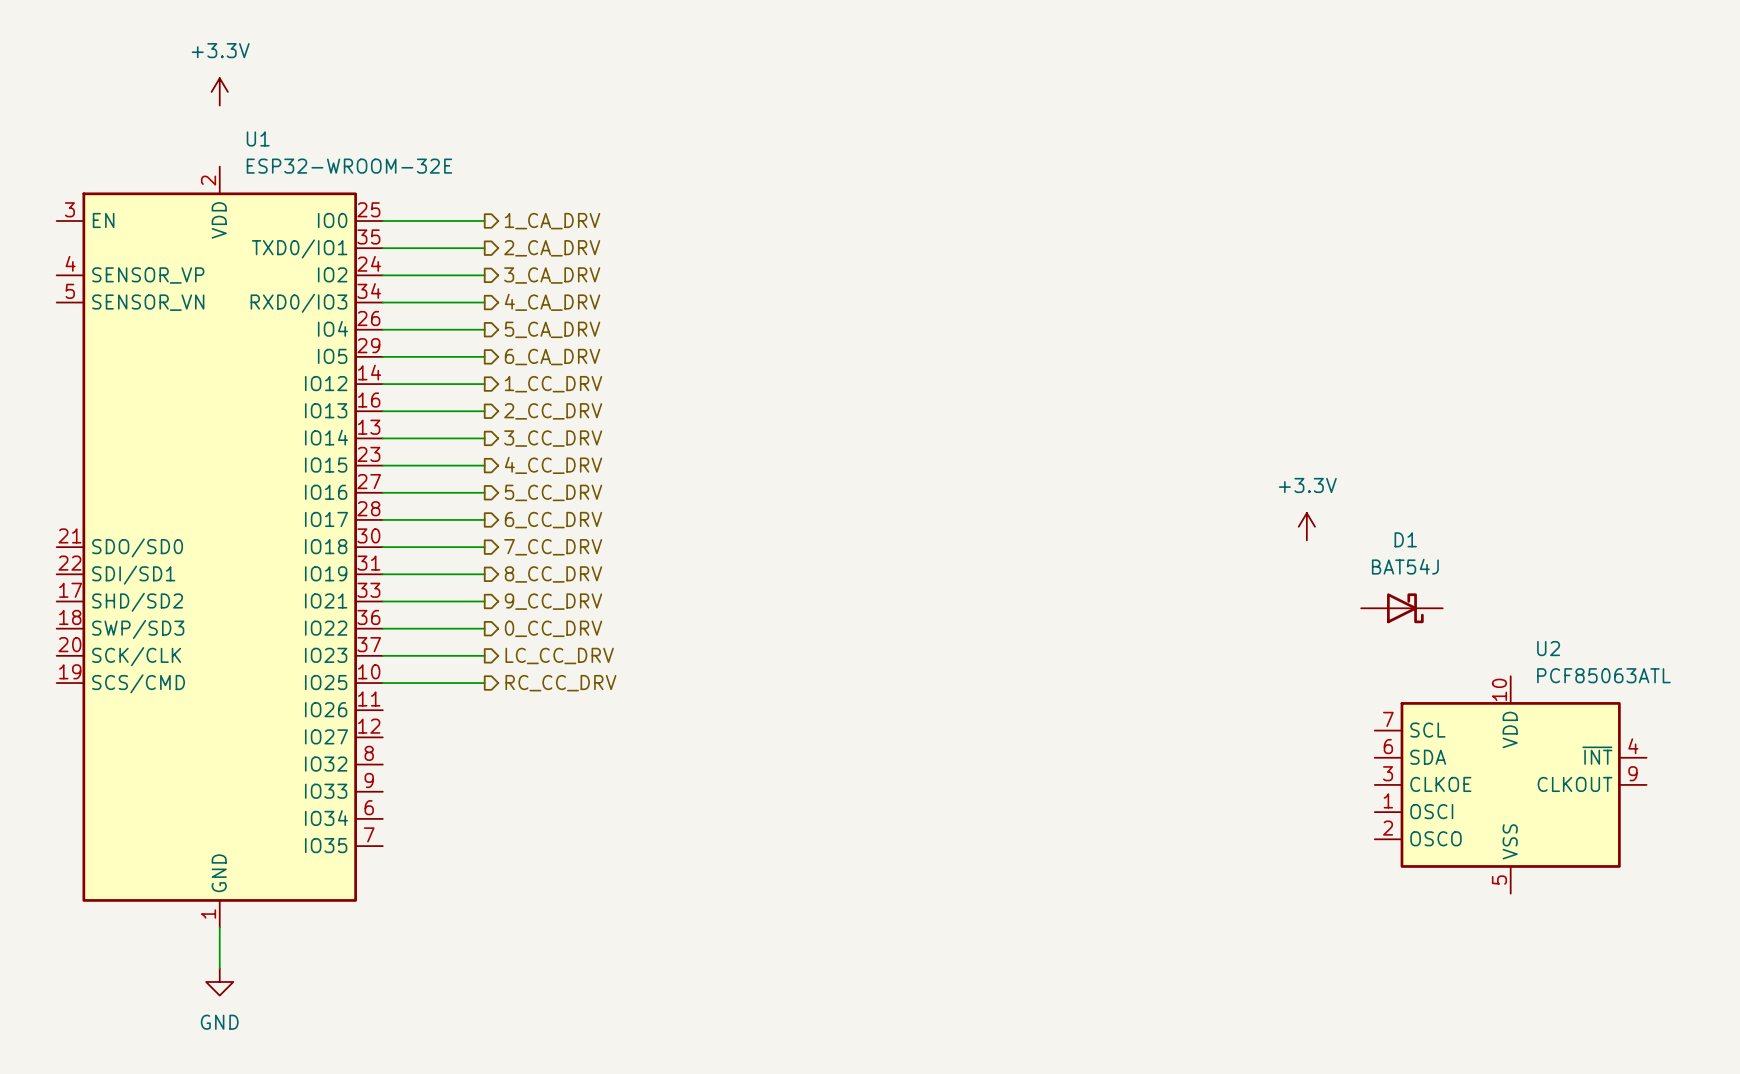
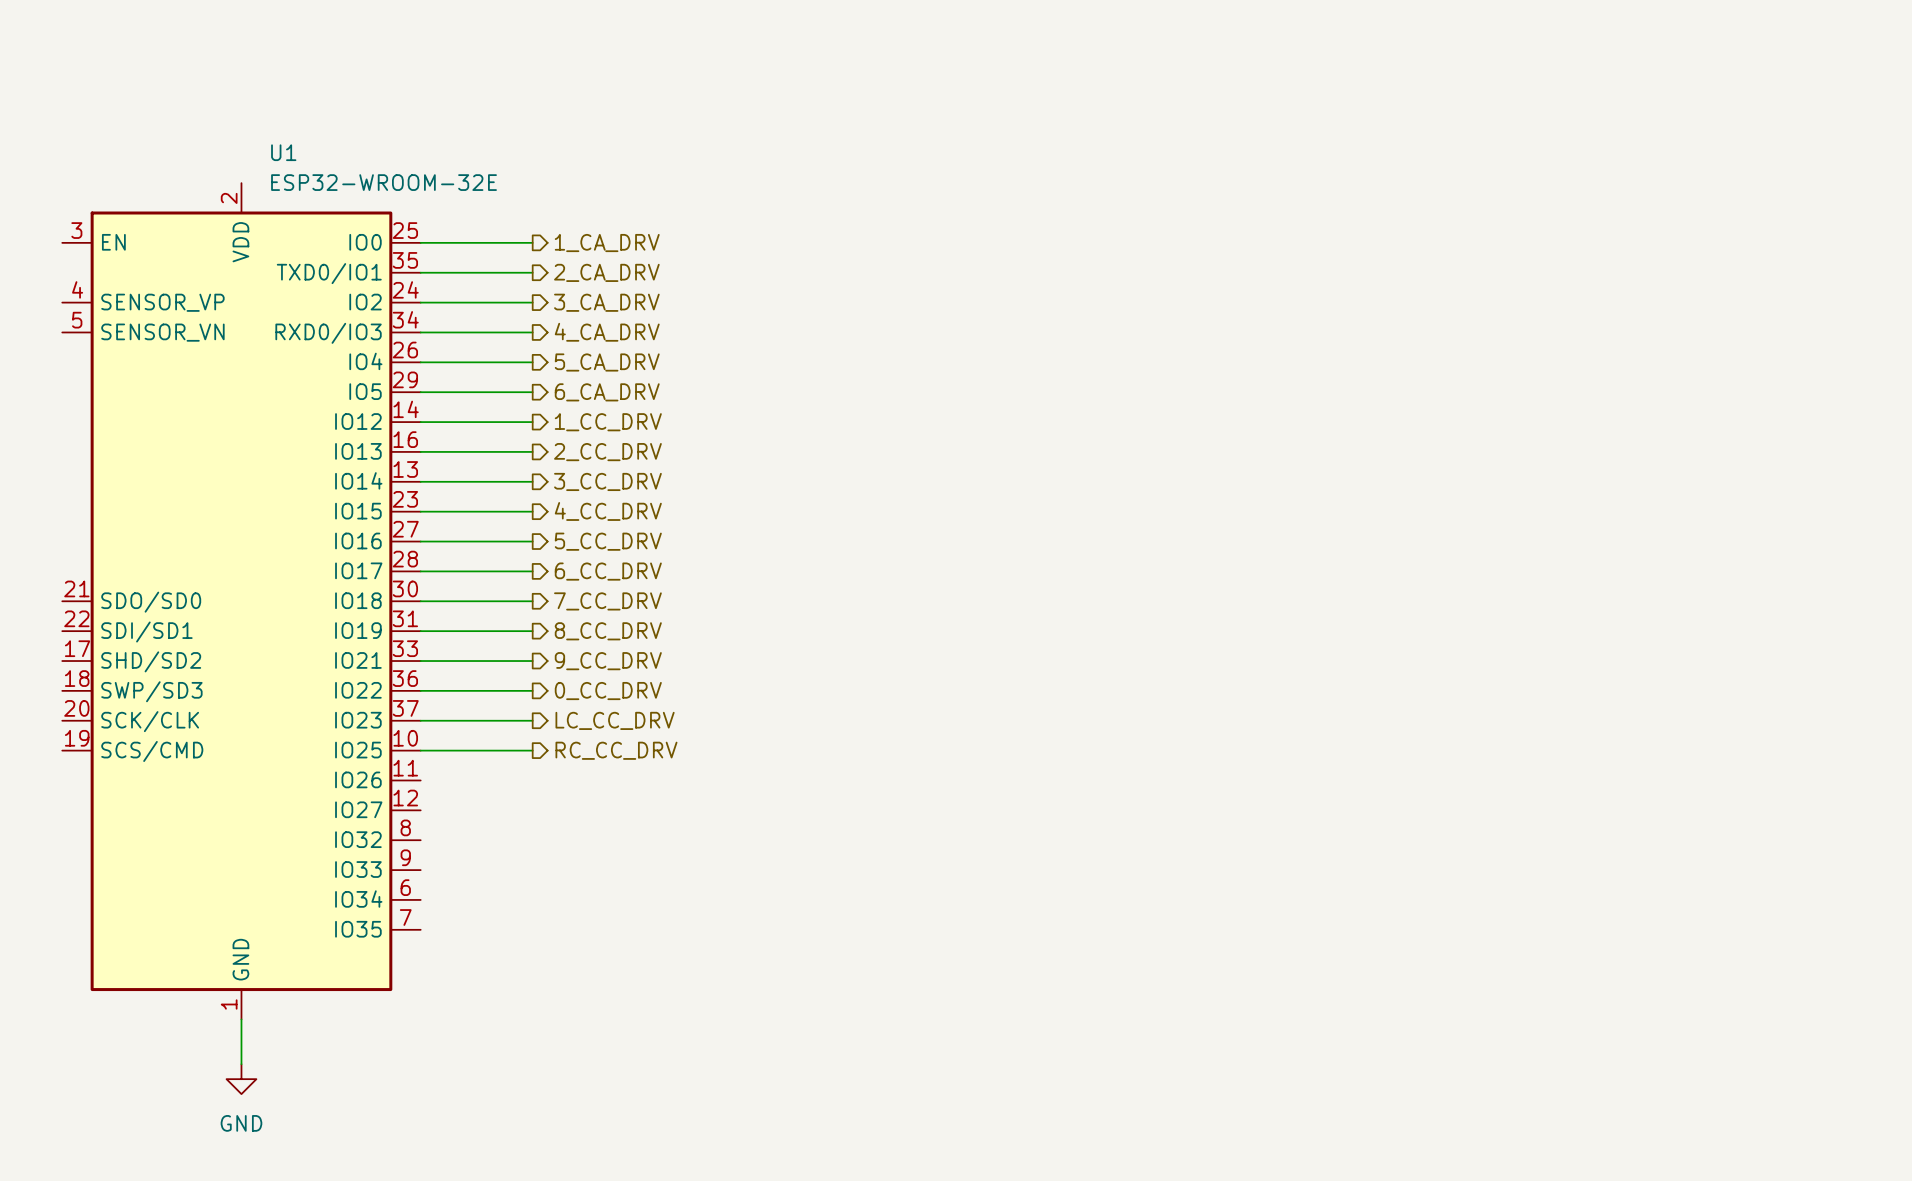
power symbol: +3.3V (219, 91) -> none
power symbol: +3.3V (1306, 526) -> none
D1: BAT54J (1401, 608) -> none
U2: PCF85063ATL (1510, 784) -> none

